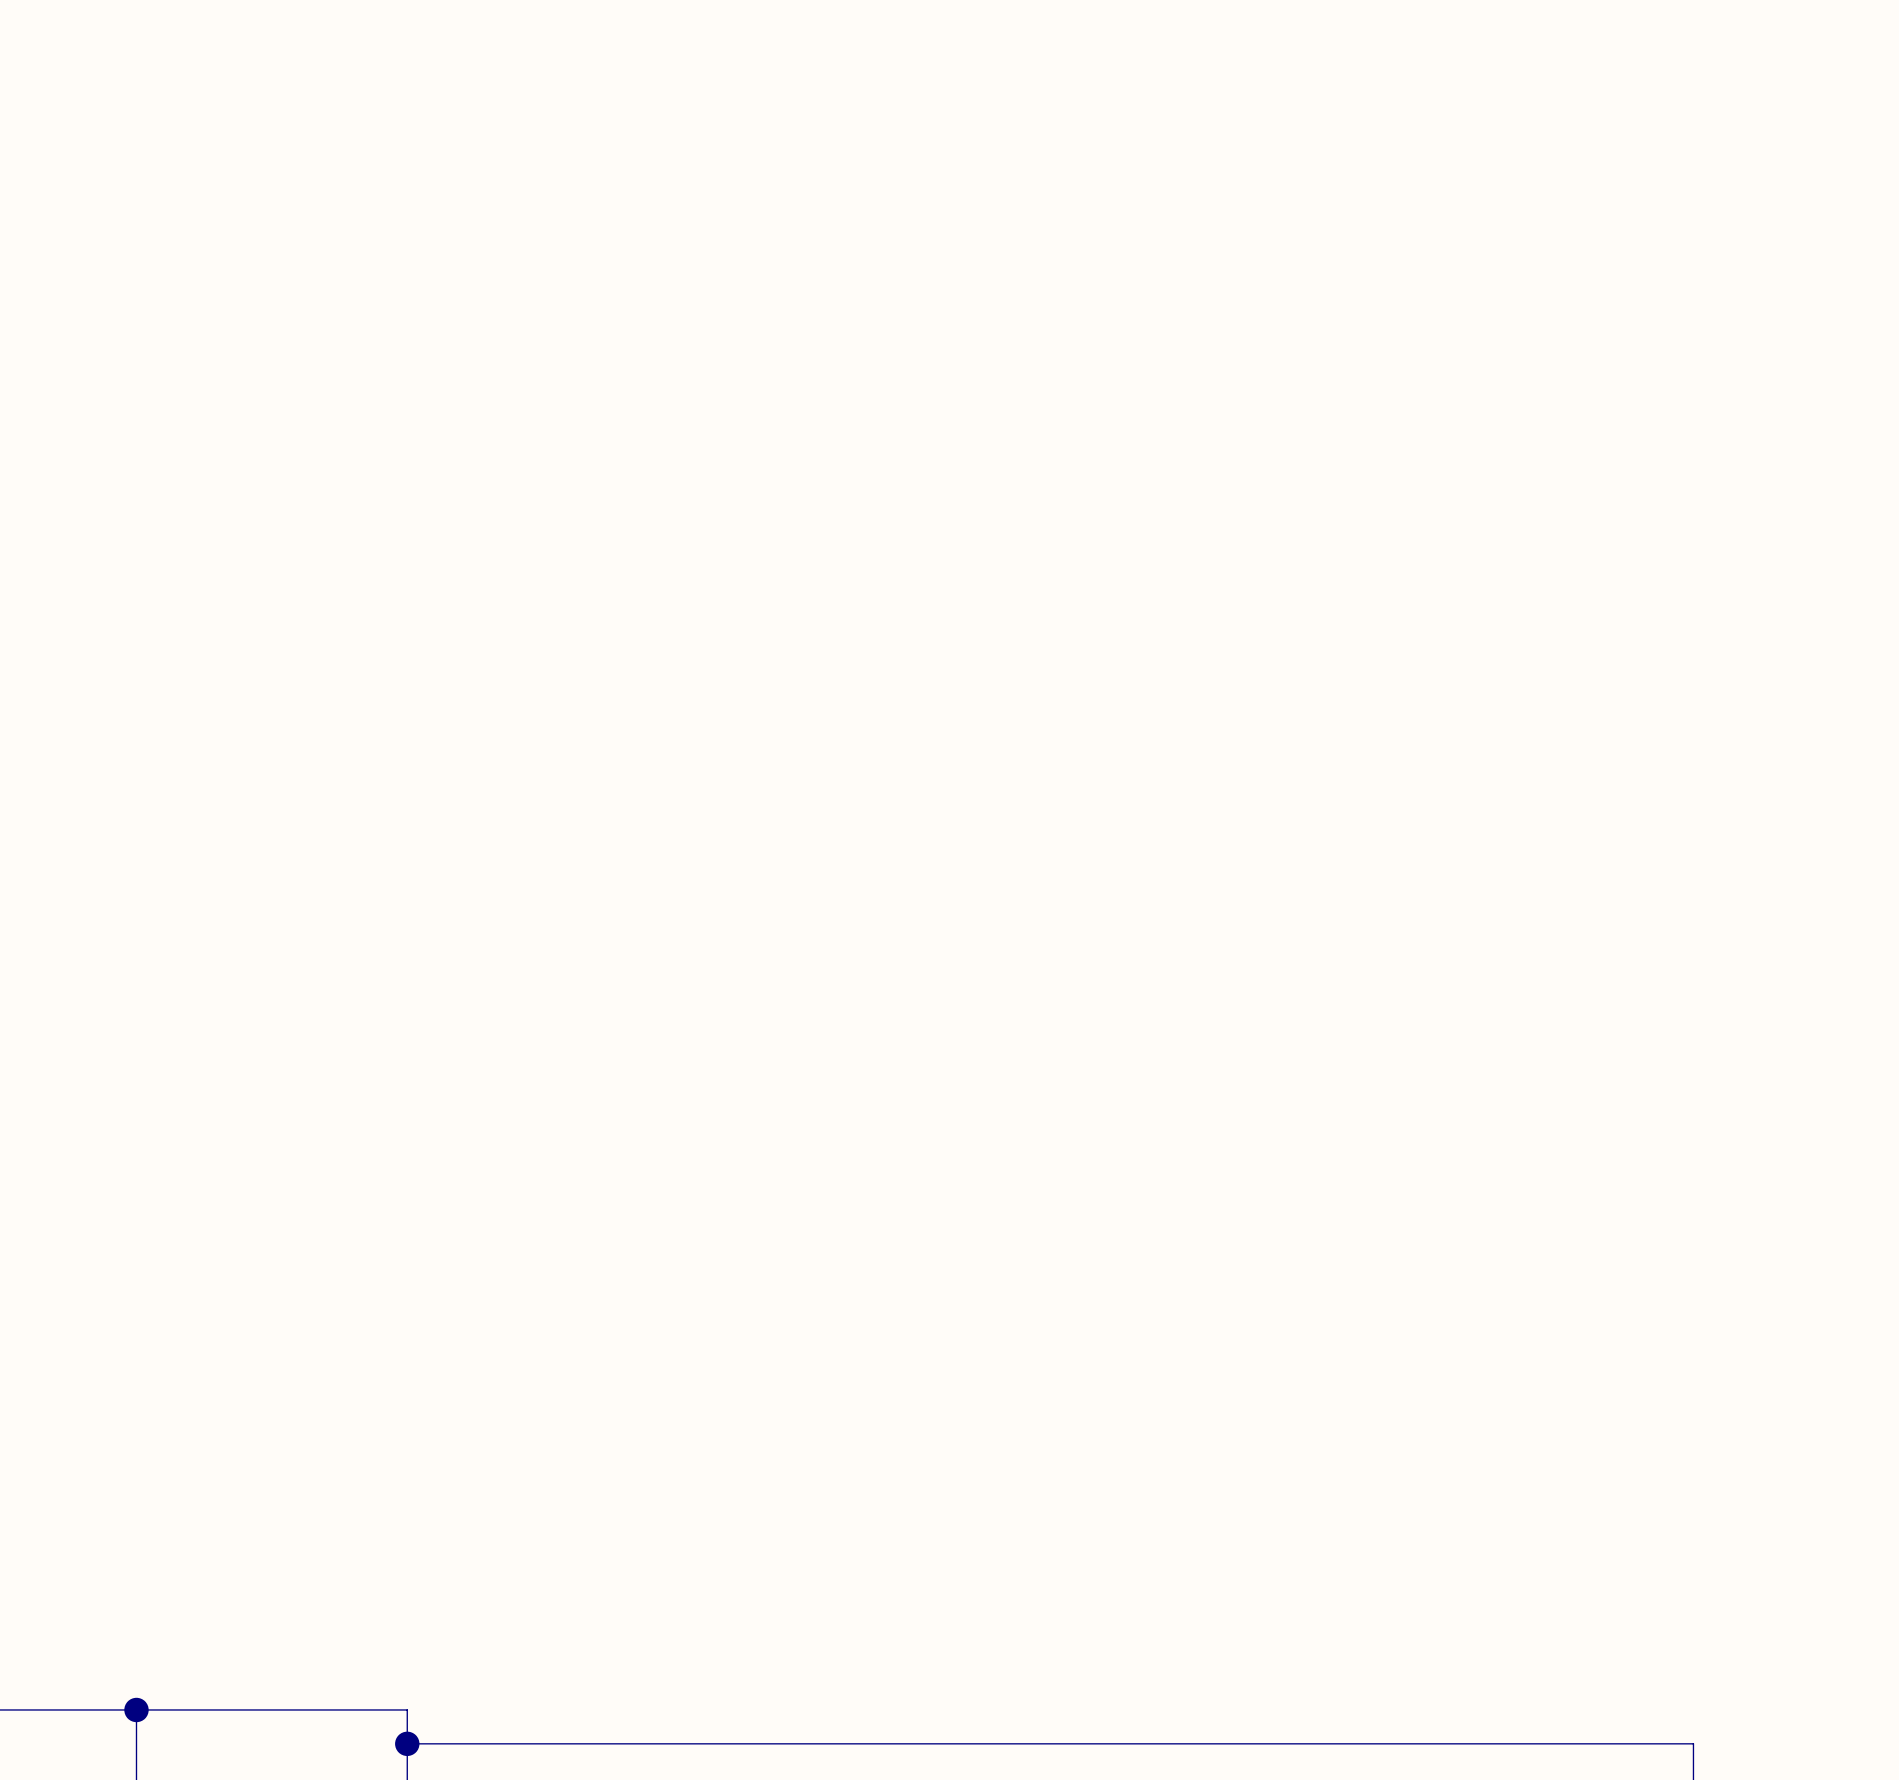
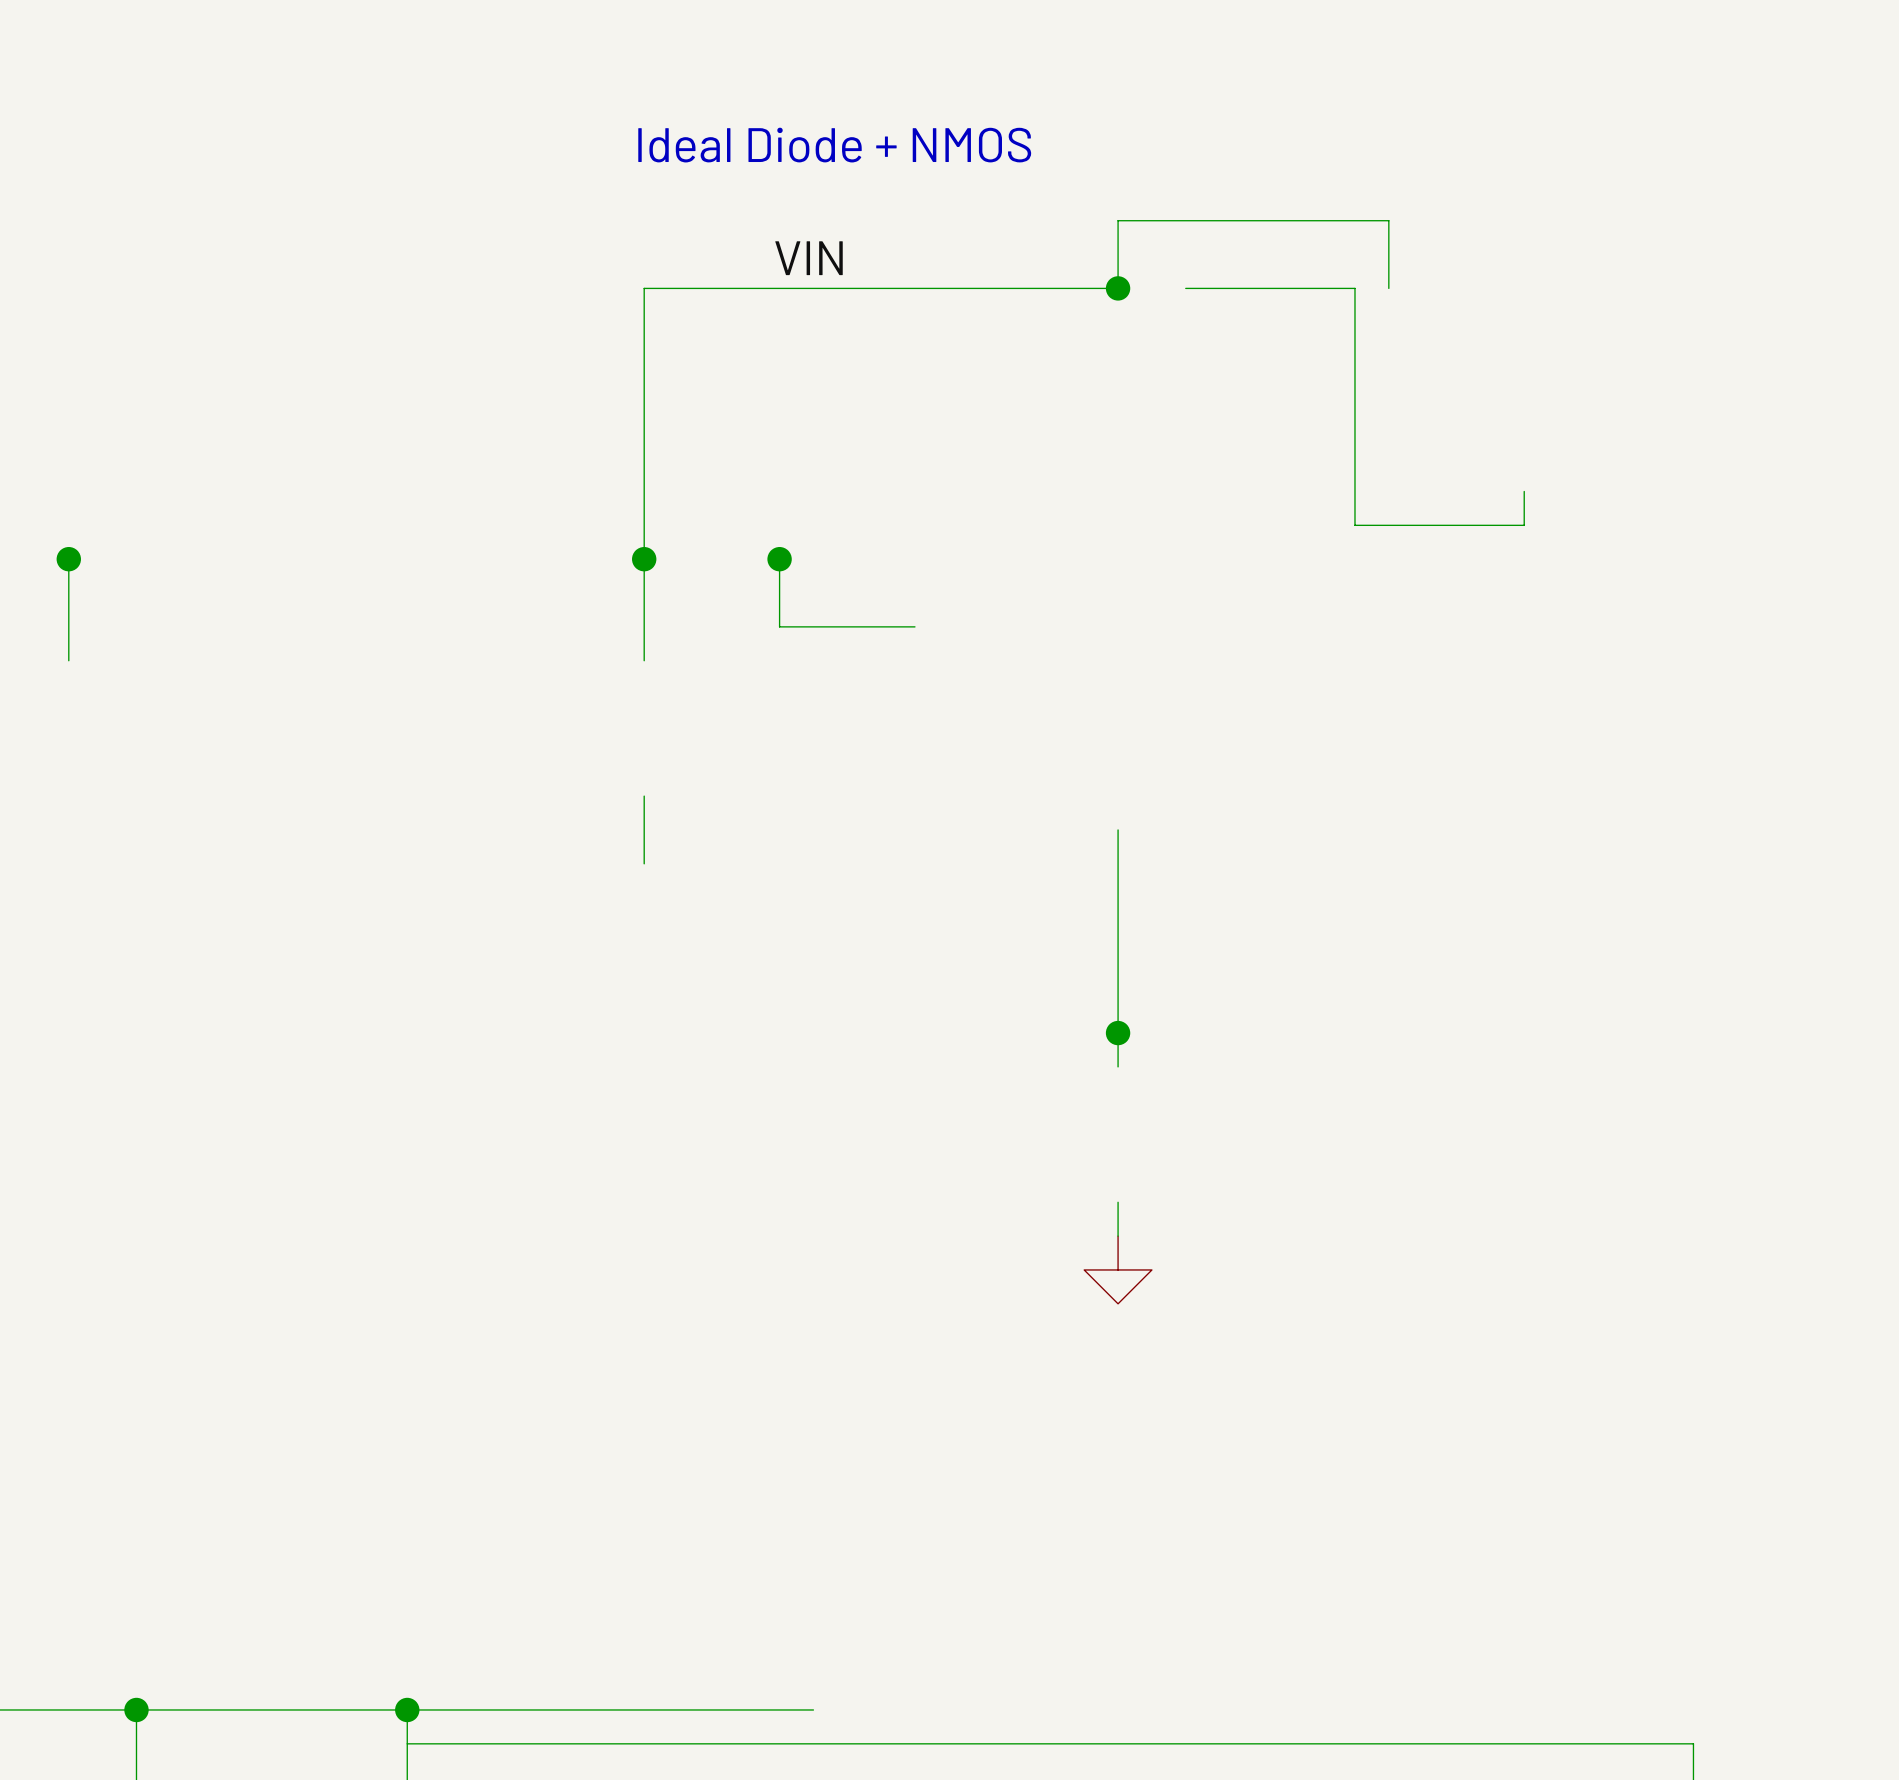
text: none -> Ideal Diode + NMOS (834, 145)
label: none -> VIN (809, 258)
junction: none -> (1118, 288)
wire: none -> (1185, 288) (1354, 288) (1354, 525) (1524, 525) (1524, 491)
wire: none -> (1388, 288) (1388, 220) (1118, 220) (1118, 288) (644, 288) (644, 660)
wire: none -> (68, 559) (68, 660)
junction: none -> (68, 559)
junction: none -> (644, 559)
wire: none -> (779, 559) (779, 626) (914, 626)
junction: none -> (779, 559)
wire: none -> (644, 796) (644, 863)
wire: none -> (1118, 829) (1118, 1066)
junction: none -> (1118, 1033)
wire: none -> (1118, 1202) (1118, 1236)
power symbol: none -> (1118, 1269)
wire: none -> (407, 1709) (813, 1709)
junction position: (407, 1743) -> (407, 1709)

